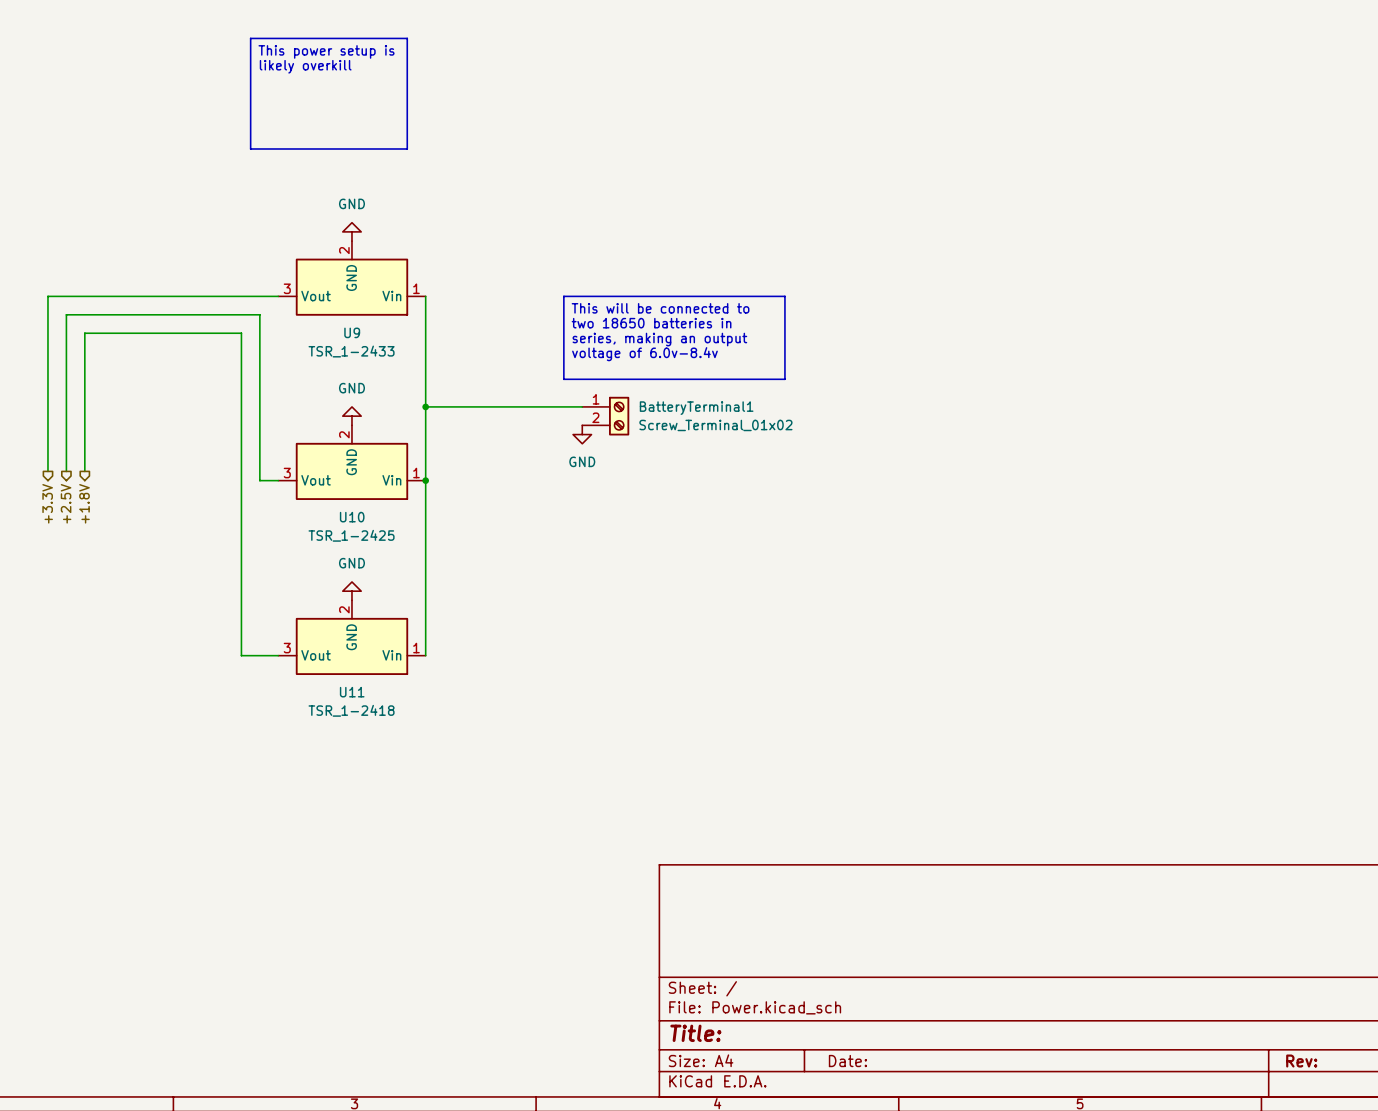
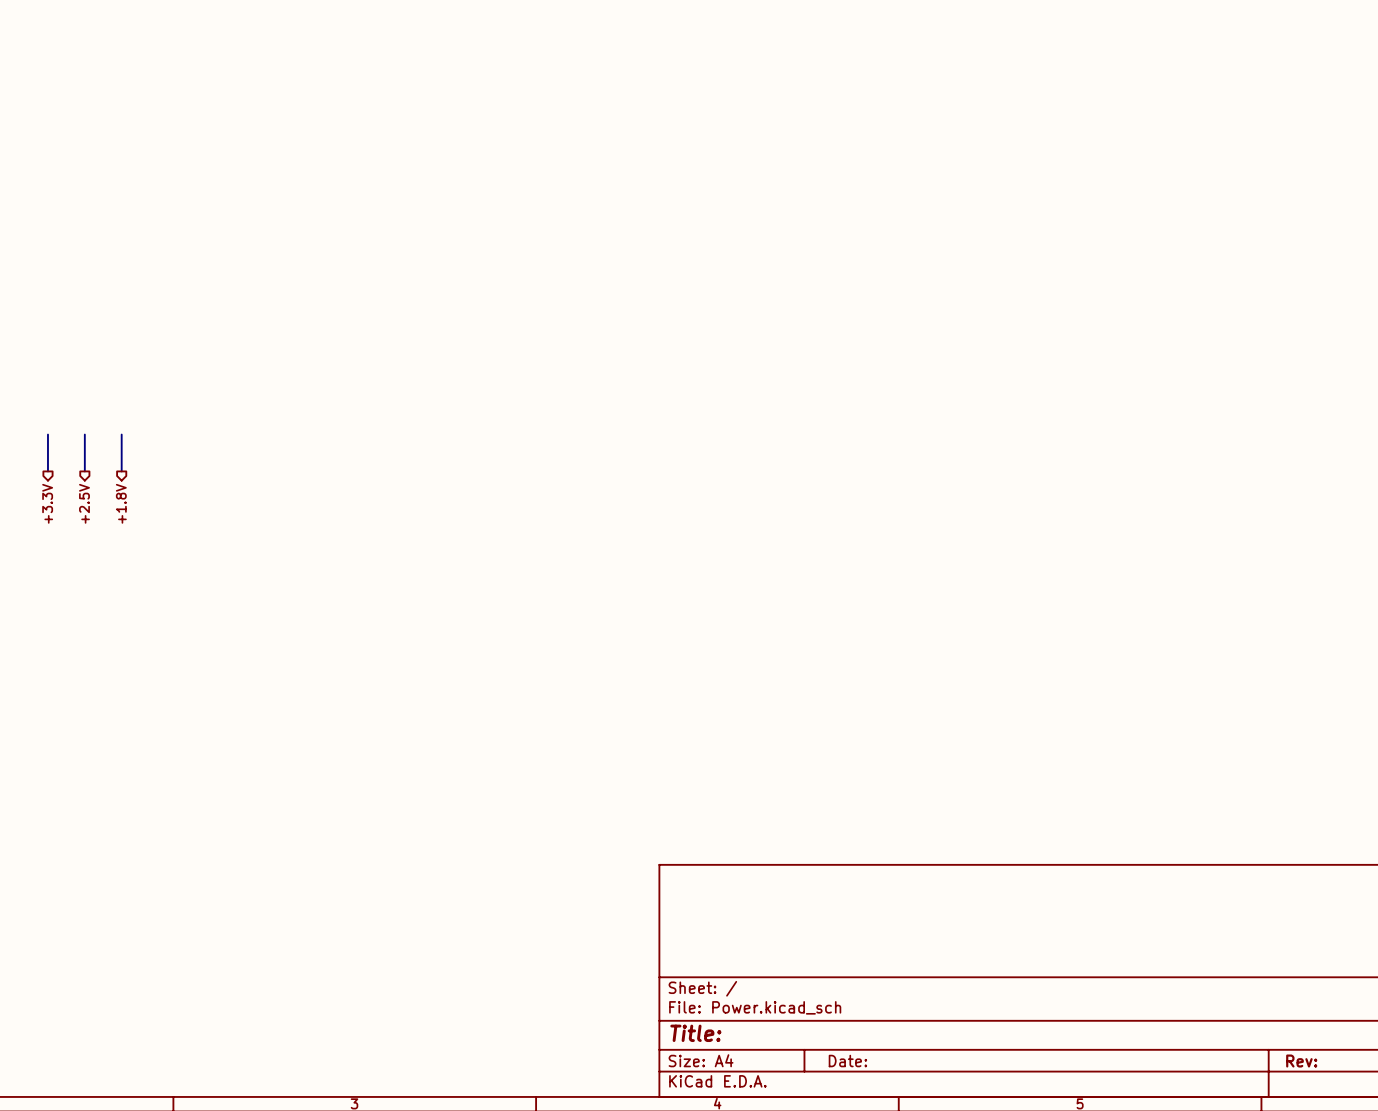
line: (250, 38) (407, 38) (407, 148) (250, 148) (250, 38) -> none
text: This power setup is (326, 51) -> none
text: likely overkill (305, 66) -> none
power symbol: GND (351, 231) -> none
U9: TSR_1-2433 (351, 278) -> none
wire: (278, 296) (47, 296) (47, 434) -> none
wire: (425, 296) (425, 655) -> none
line: (563, 296) (784, 296) (784, 379) (563, 379) (563, 296) -> none
text: This will be connected to (660, 308) -> none
text: two 18650 batteries in (651, 323) -> none
text: series, making an output (659, 339) -> none
text: voltage of 6.0v-8.4v (644, 354) -> none
wire: (425, 406) (582, 406) -> none
junction: (425, 406) -> none
power symbol: GND (351, 416) -> none
BatteryTerminal1: Screw_Terminal_01x02 (605, 416) -> none
wire: (84, 434) (84, 333) (241, 333) (241, 655) (278, 655) -> none
wire: none -> (121, 434) (121, 471)
power symbol: GND (582, 434) -> none
U10: TSR_1-2425 (351, 462) -> none
wire: (66, 471) (66, 314) (259, 314) (259, 480) (278, 480) -> none
junction: (425, 480) -> none
hierarchical label: +2.5V (66, 503) -> none
hierarchical label: +1.8V (84, 503) -> +2.5V (84, 503)
hierarchical label: none -> +1.8V (121, 503)
power symbol: GND (351, 591) -> none
U11: TSR_1-2418 (351, 637) -> none

